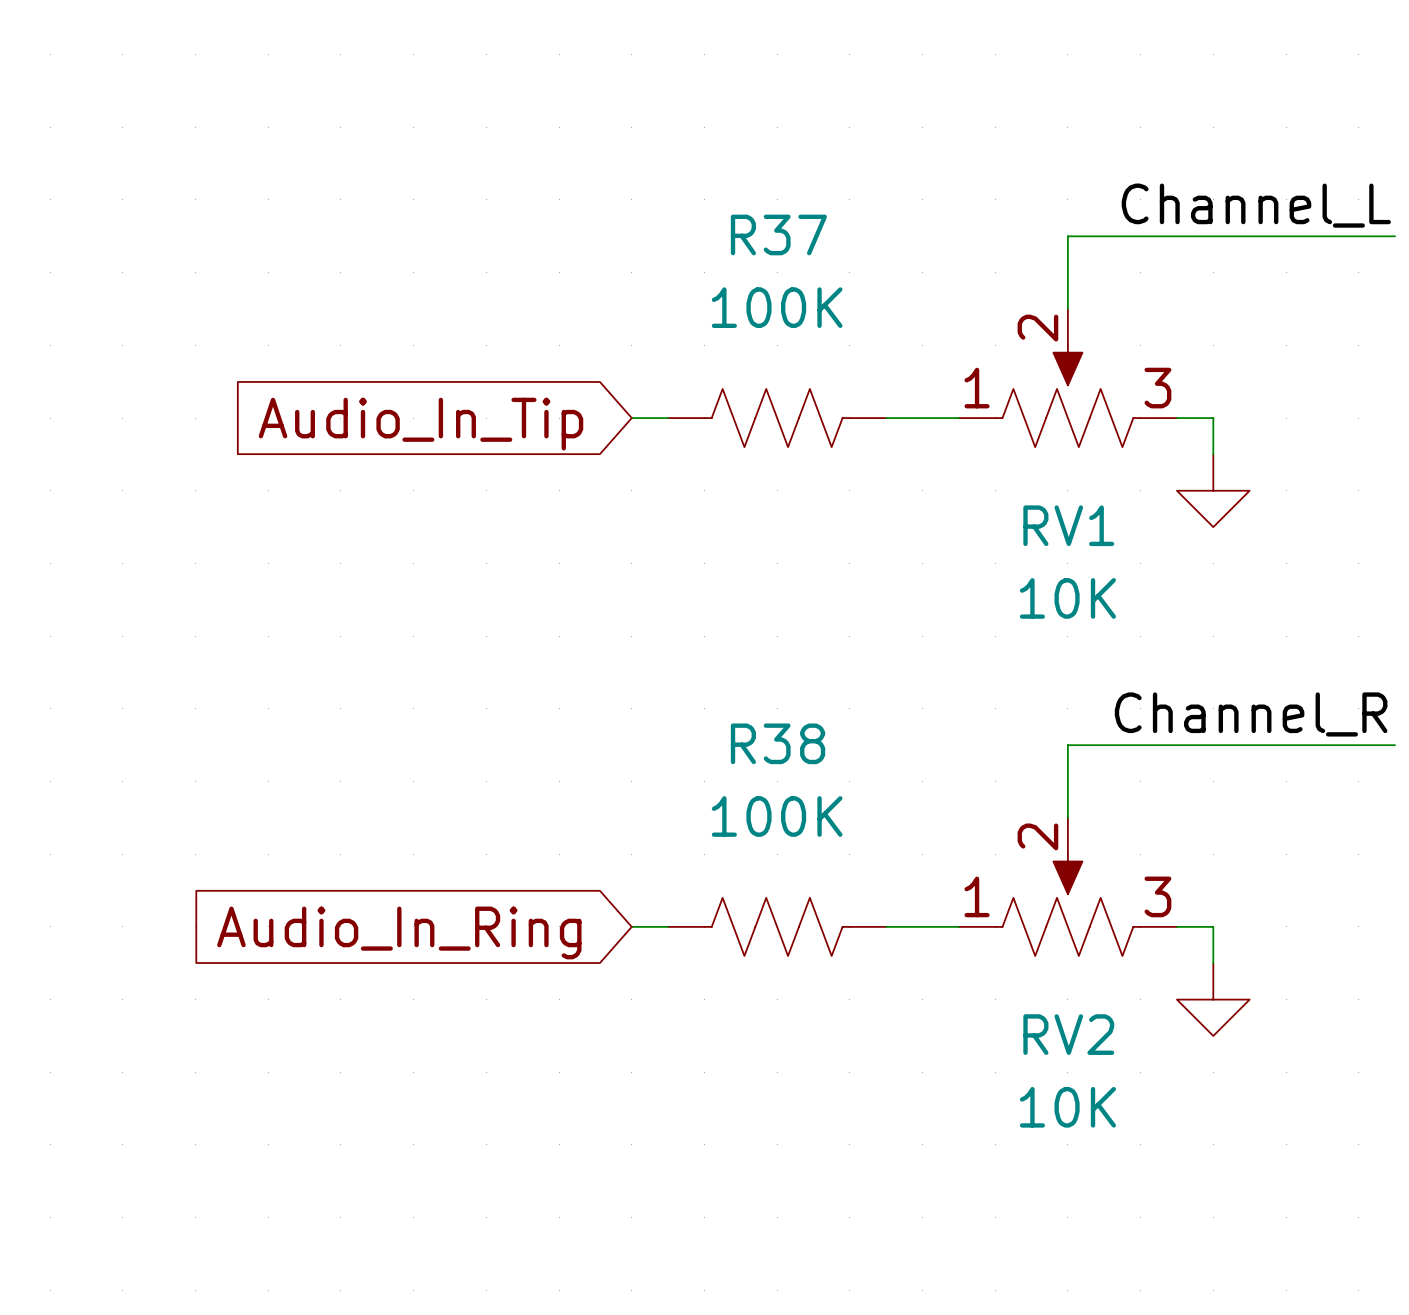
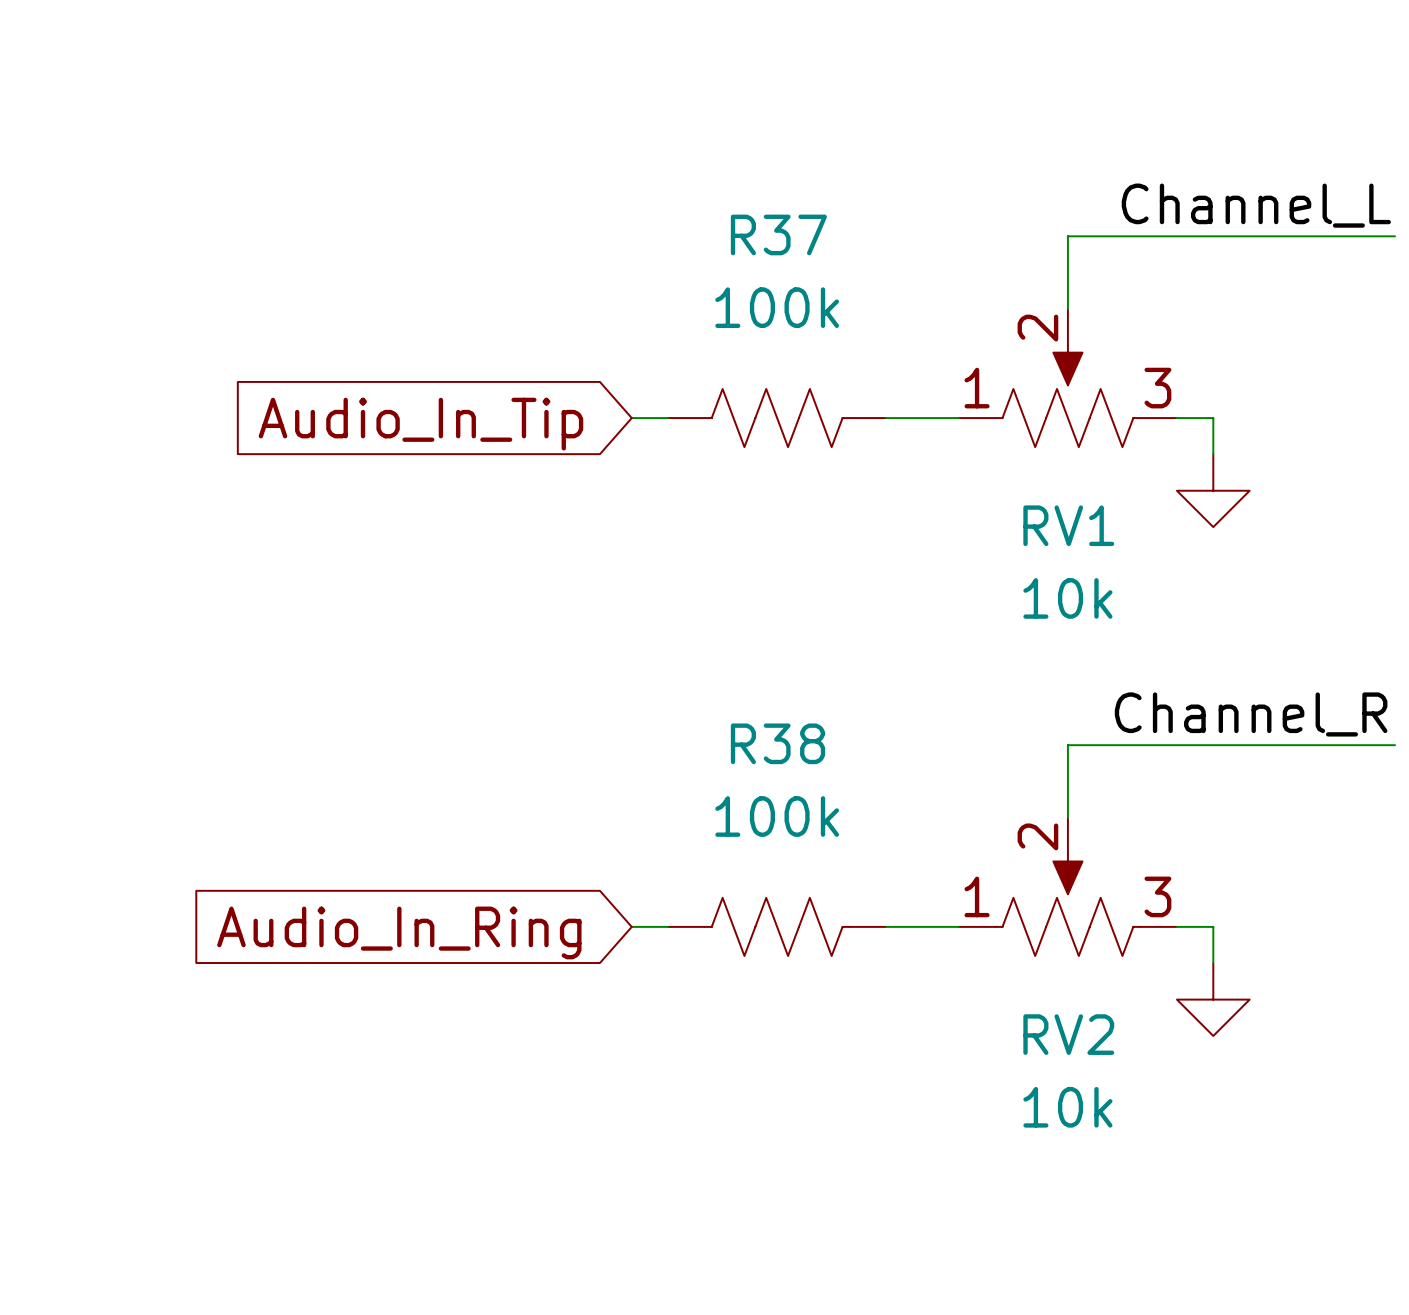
R37 value: 100K (777, 307) -> 100k (777, 307)
RV1 value: 10K (1067, 598) -> 10k (1067, 598)
R38 value: 100K (777, 816) -> 100k (777, 816)
RV2 value: 10K (1067, 1107) -> 10k (1067, 1107)

